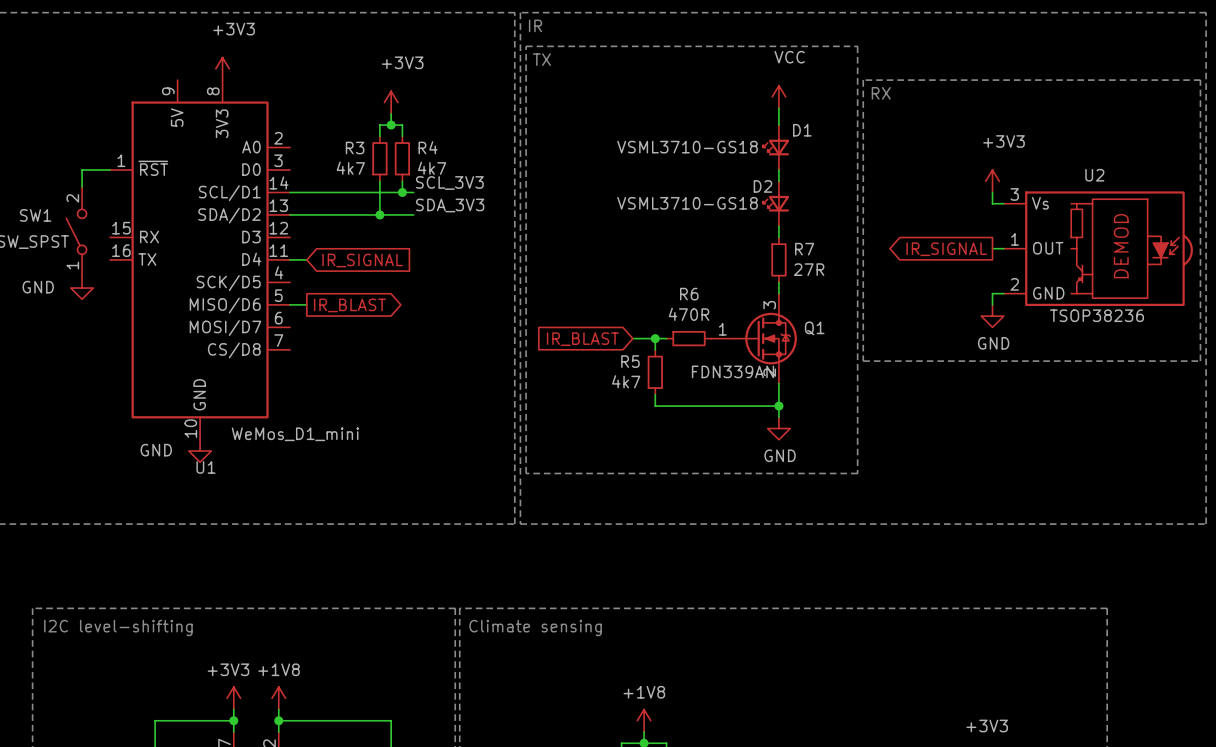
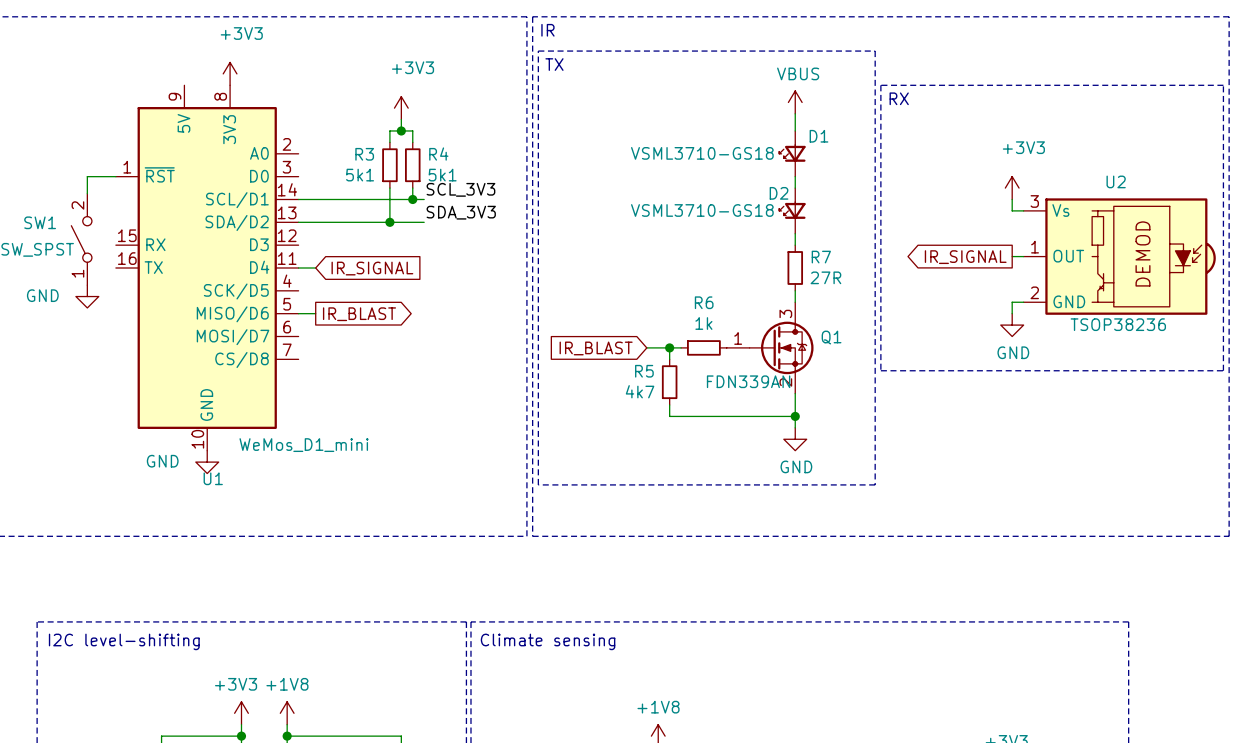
power symbol: VCC (778, 96) -> VBUS (795, 102)
R3 value: 4k7 (350, 168) -> 5k1 (360, 175)
R4 value: 4k7 (432, 168) -> 5k1 (442, 175)
R6 value: 470R (689, 314) -> 1k (703, 323)

